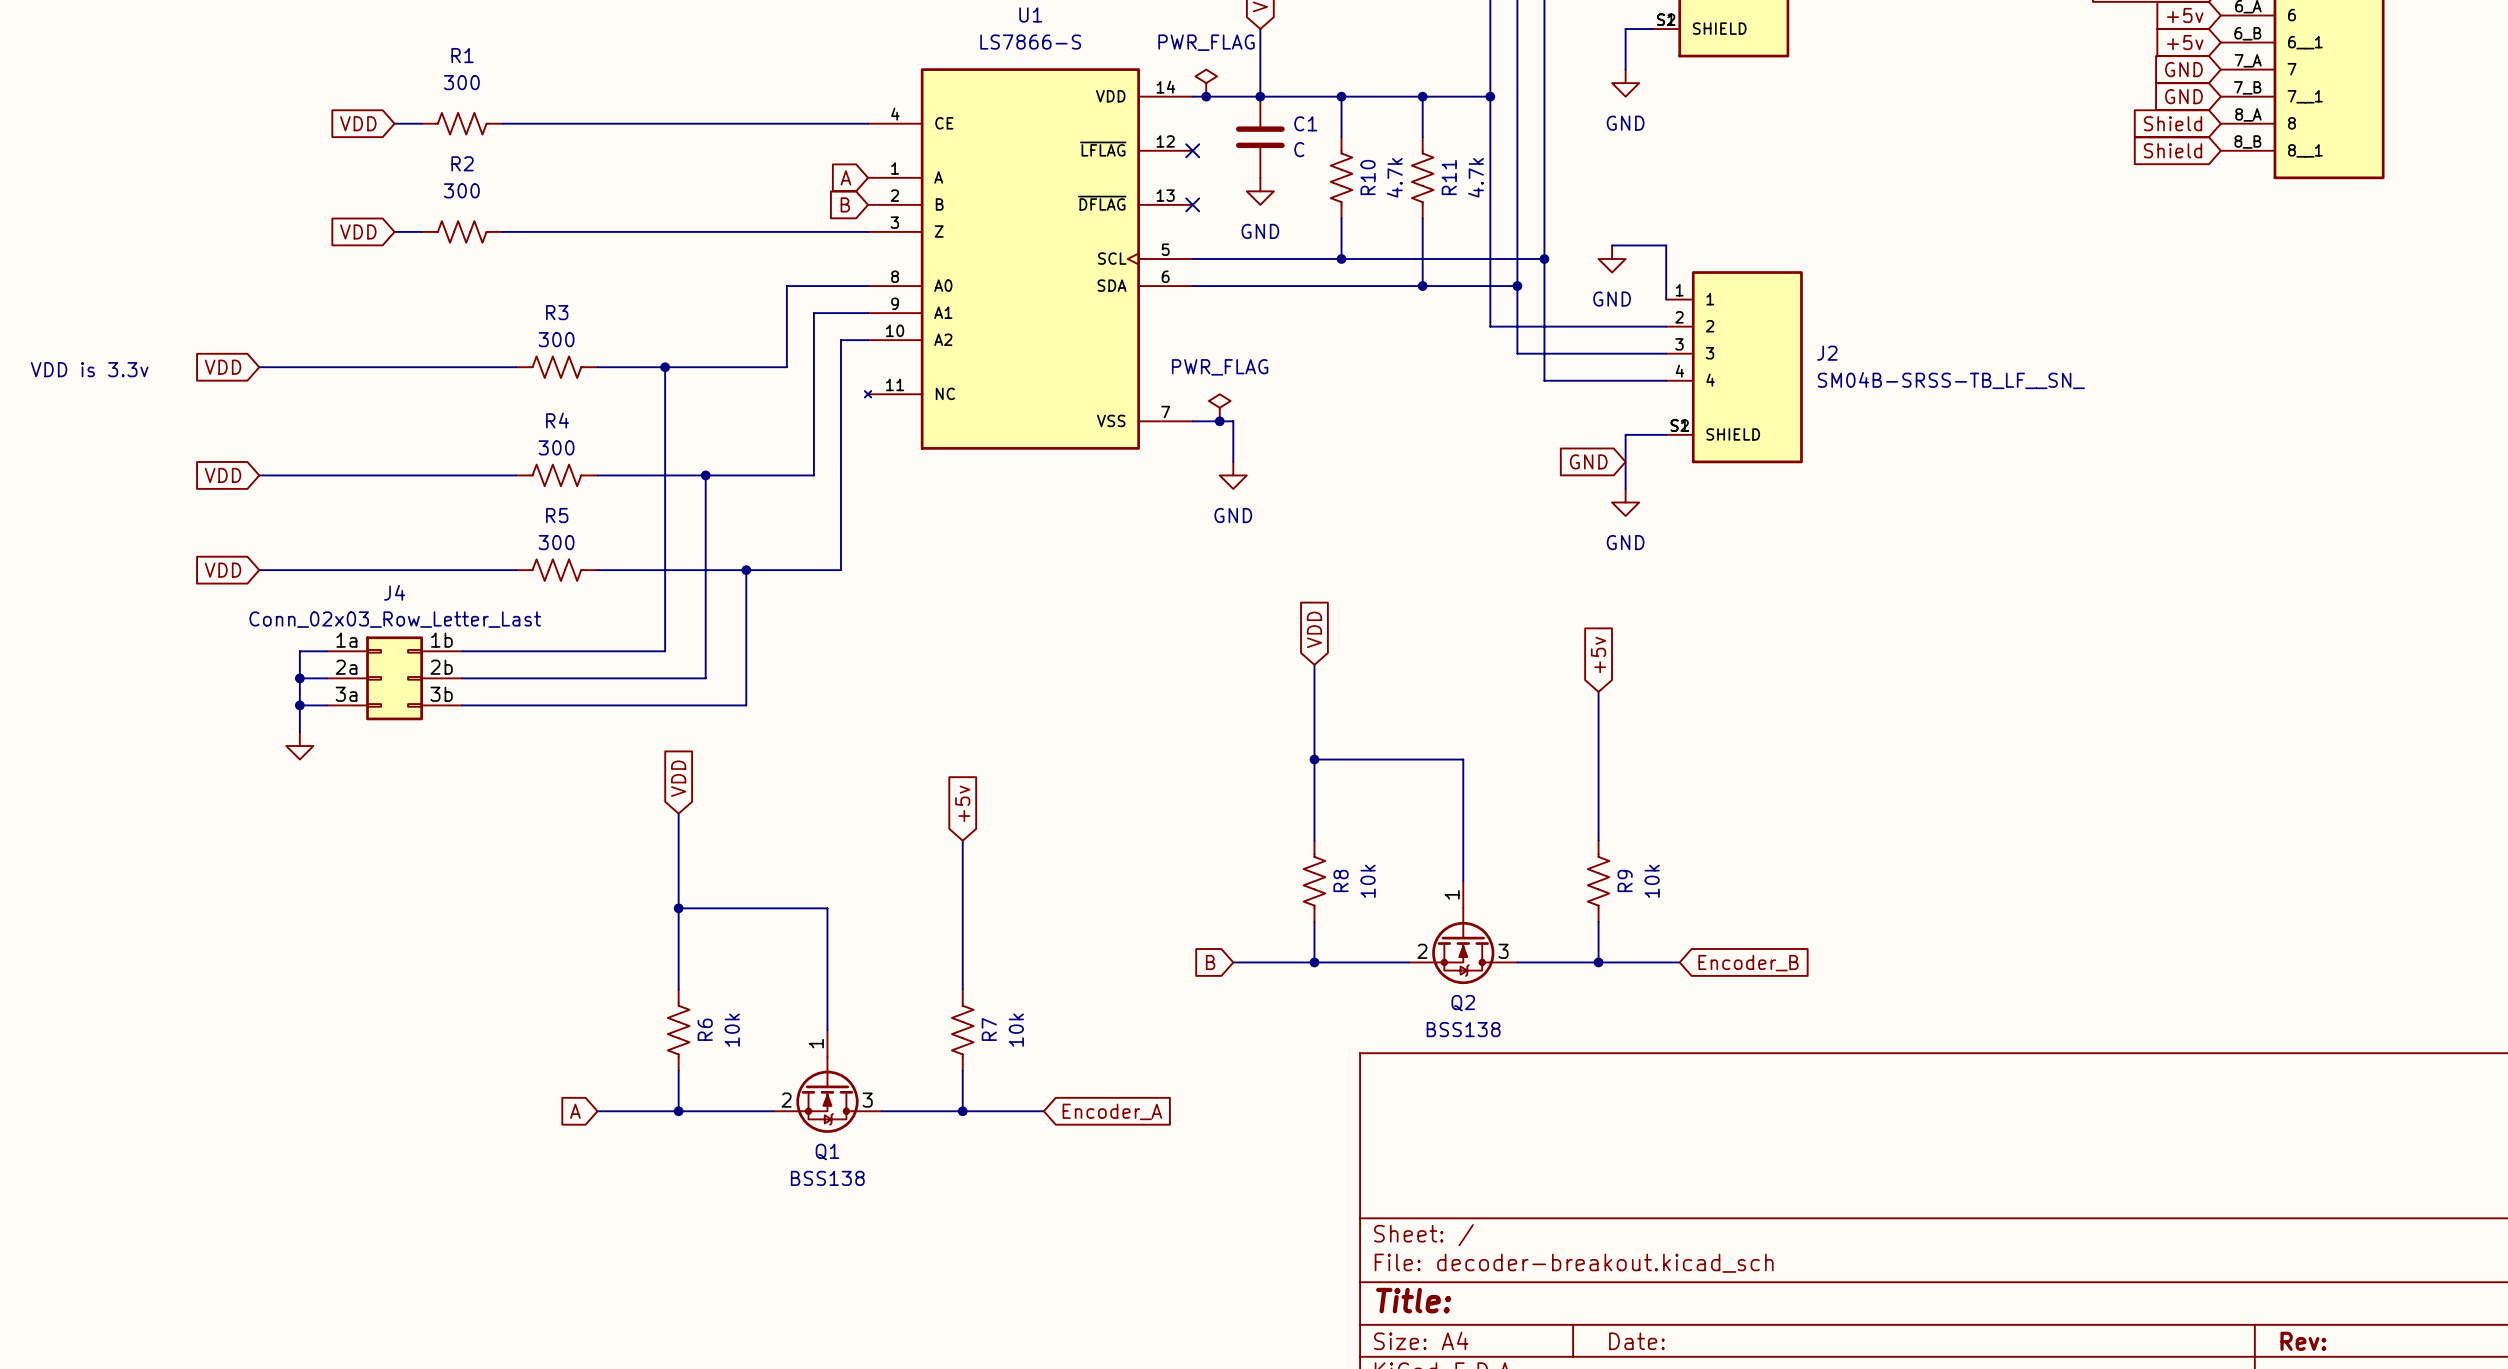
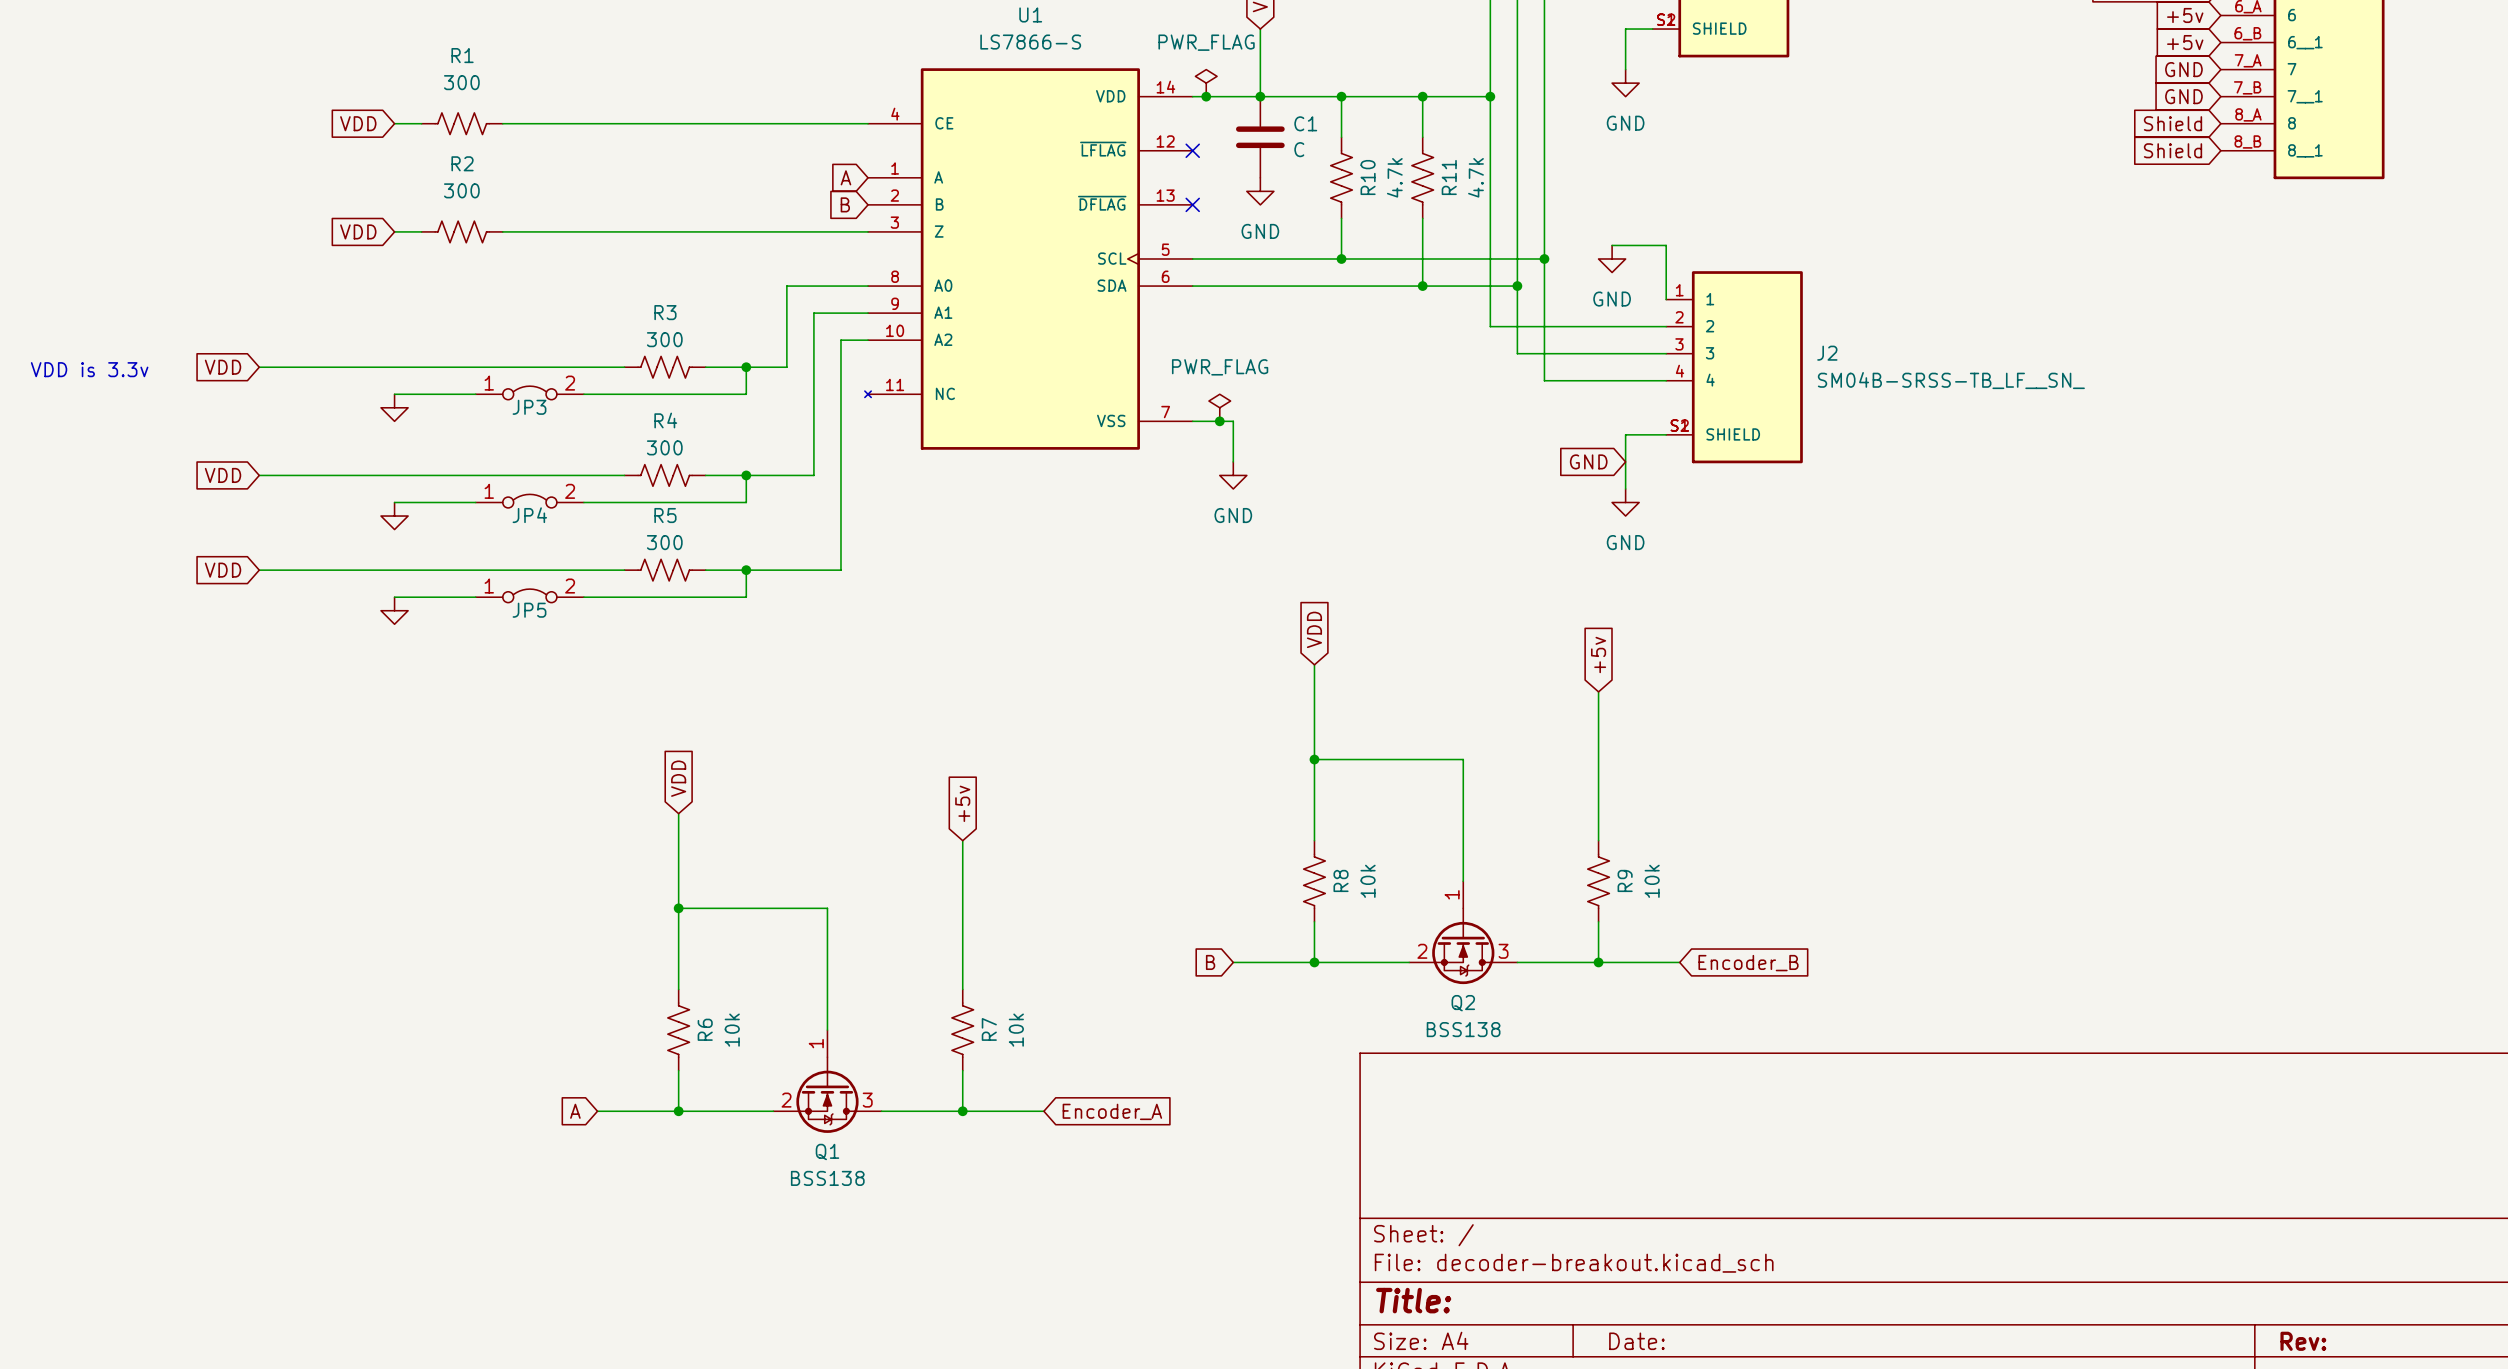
R3 position: (556, 367) -> (665, 367)
wire: (665, 367) (665, 651) (462, 651) -> none
junction: (665, 367) -> none
wire: none -> (746, 367) (746, 394) (583, 394)
junction: none -> (746, 367)
JP3: none -> (529, 392)
wire: none -> (394, 394) (475, 394)
power symbol: none -> (394, 407)
R4 position: (556, 475) -> (665, 475)
wire: (624, 475) (705, 475) (705, 678) (462, 678) -> none
junction position: (705, 475) -> (746, 475)
wire: none -> (746, 475) (746, 502) (583, 502)
JP4: none -> (529, 501)
wire: none -> (394, 502) (475, 502)
power symbol: none -> (394, 516)
R5 position: (556, 570) -> (665, 570)
JP5: none -> (529, 595)
wire: none -> (394, 597) (475, 597)
wire: (746, 597) (746, 705) (462, 705) -> (746, 597) (583, 597)
power symbol: none -> (394, 610)
wire: (326, 651) (299, 651) (299, 732) -> none
wire: (299, 678) (326, 678) -> none
junction: (299, 678) -> none
J4: Conn_02x03_Row_Letter_Last (394, 678) -> none
wire: (299, 705) (326, 705) -> none
junction: (299, 705) -> none
power symbol: (299, 746) -> none

